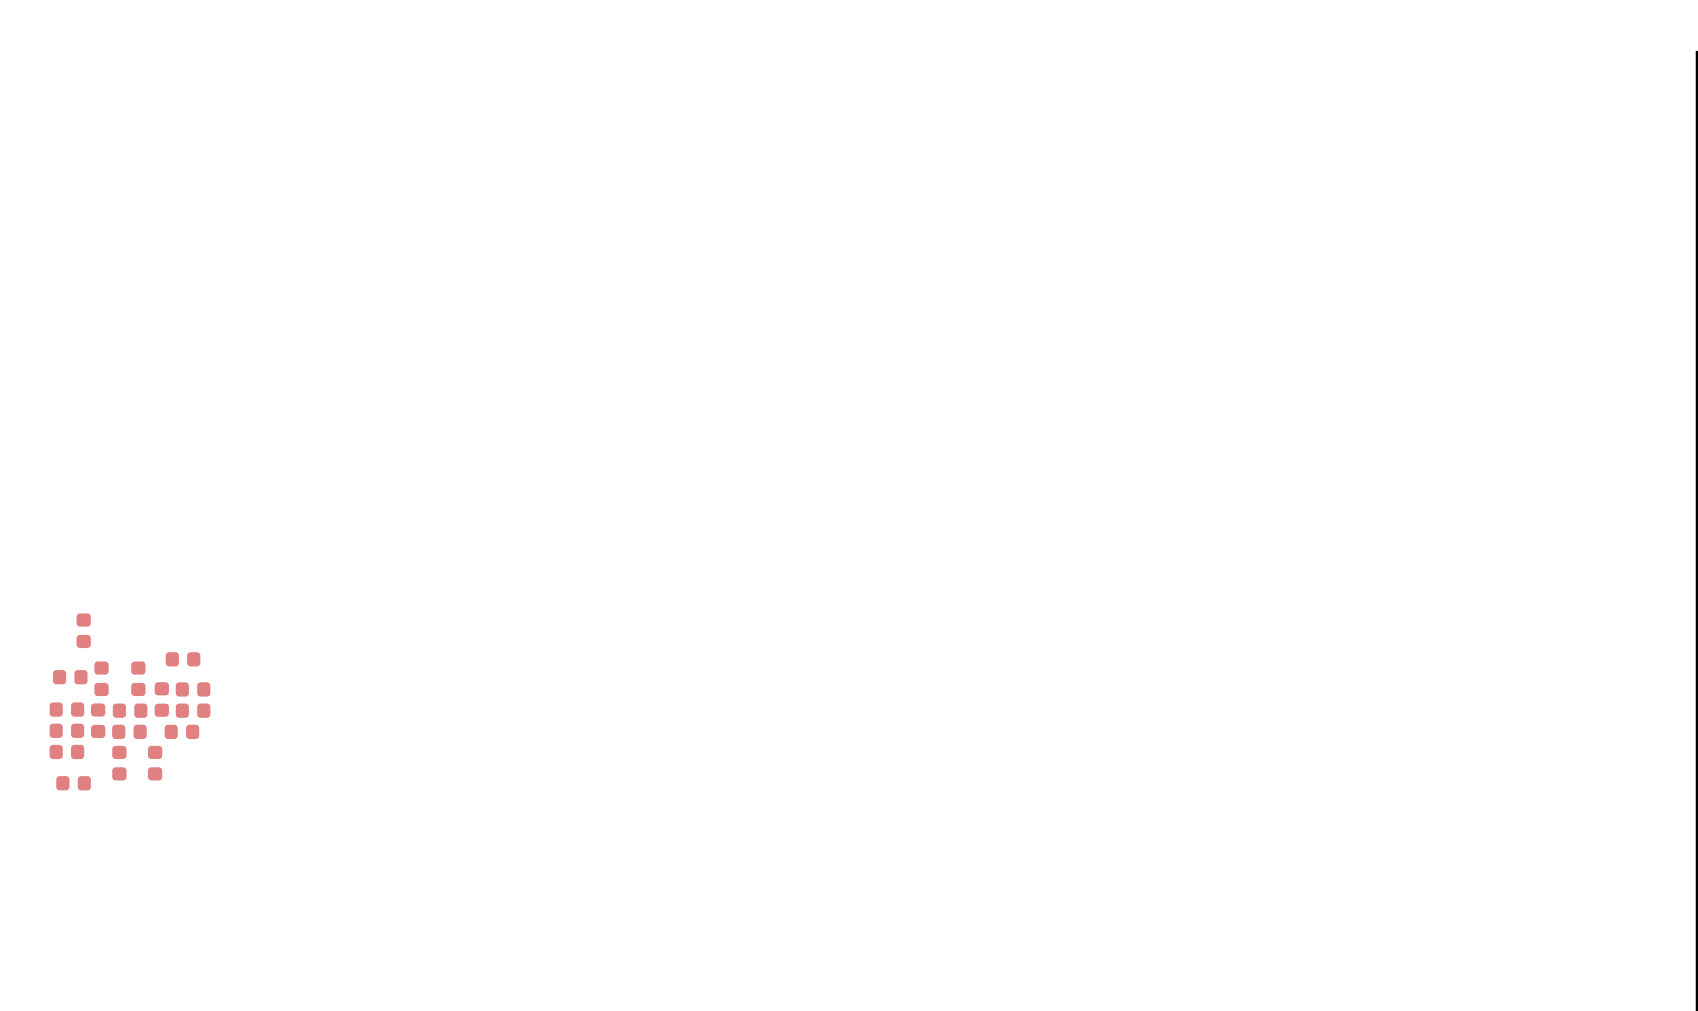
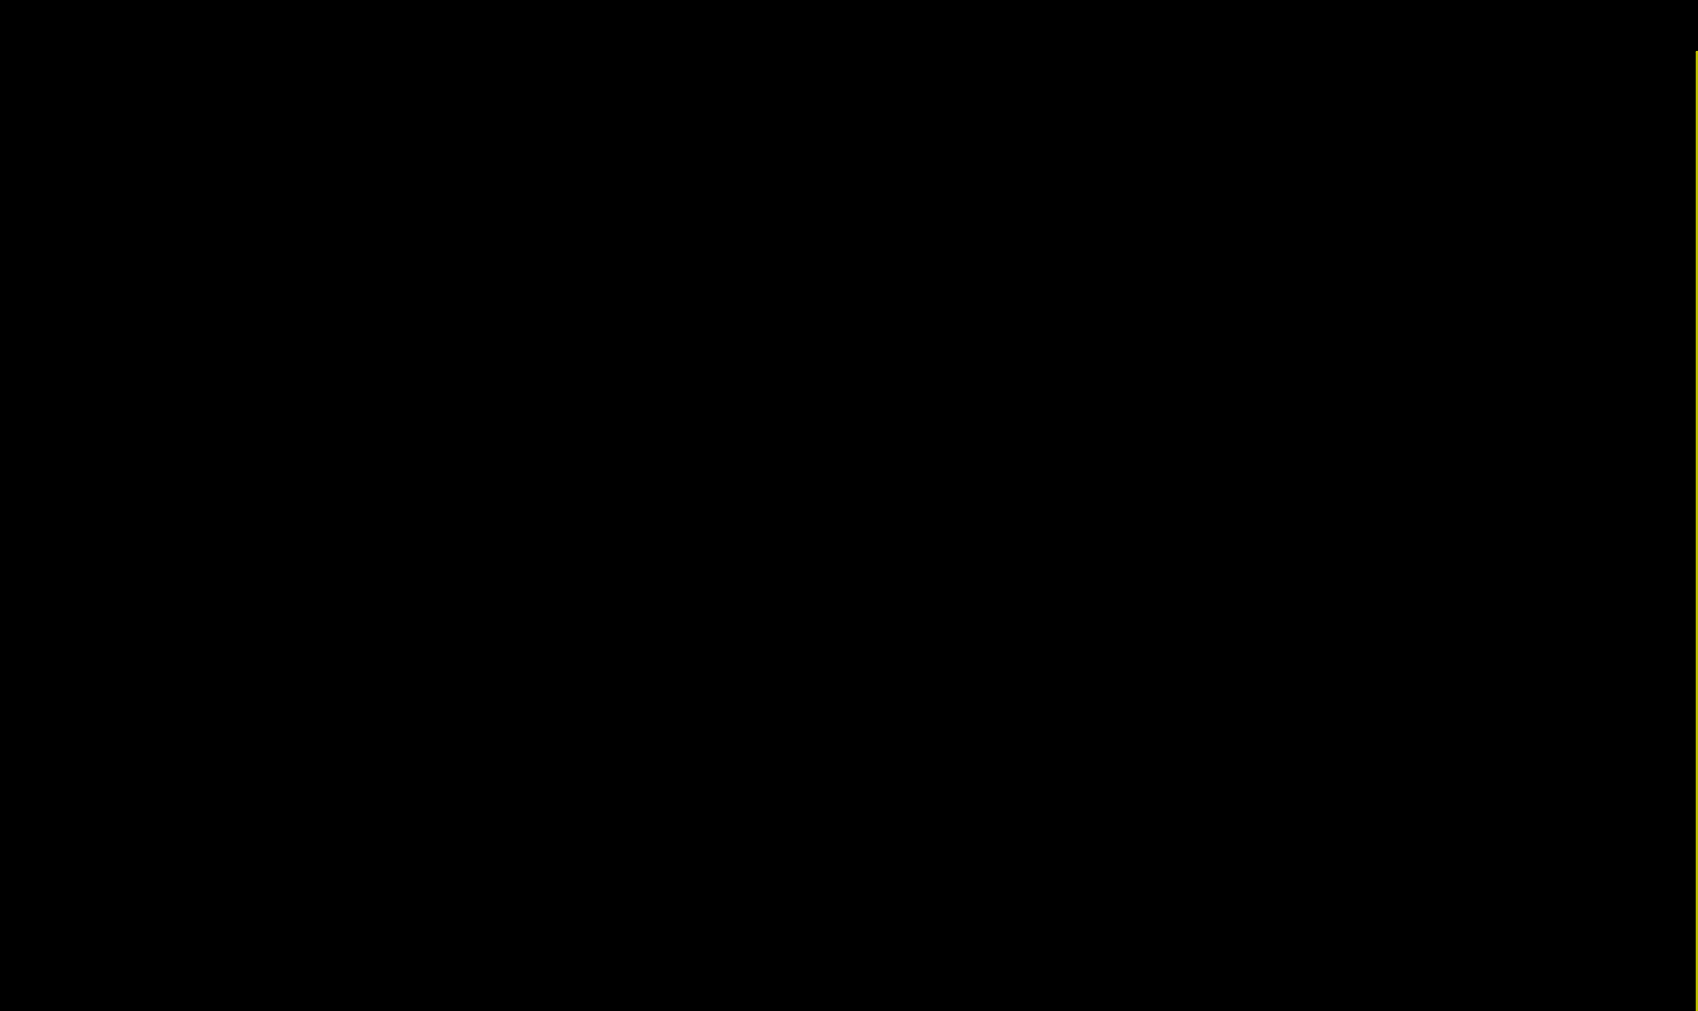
part: (83, 630) -> none
part: (183, 659) -> none
part: (70, 677) -> none
part: (101, 678) -> none
part: (138, 678) -> none
part: (193, 689) -> none
part: (161, 699) -> none
part: (66, 709) -> none
part: (130, 710) -> none
part: (193, 710) -> none
part: (98, 720) -> none
part: (66, 730) -> none
part: (129, 731) -> none
part: (181, 731) -> none
part: (66, 751) -> none
part: (119, 763) -> none
part: (155, 763) -> none
part: (73, 783) -> none

